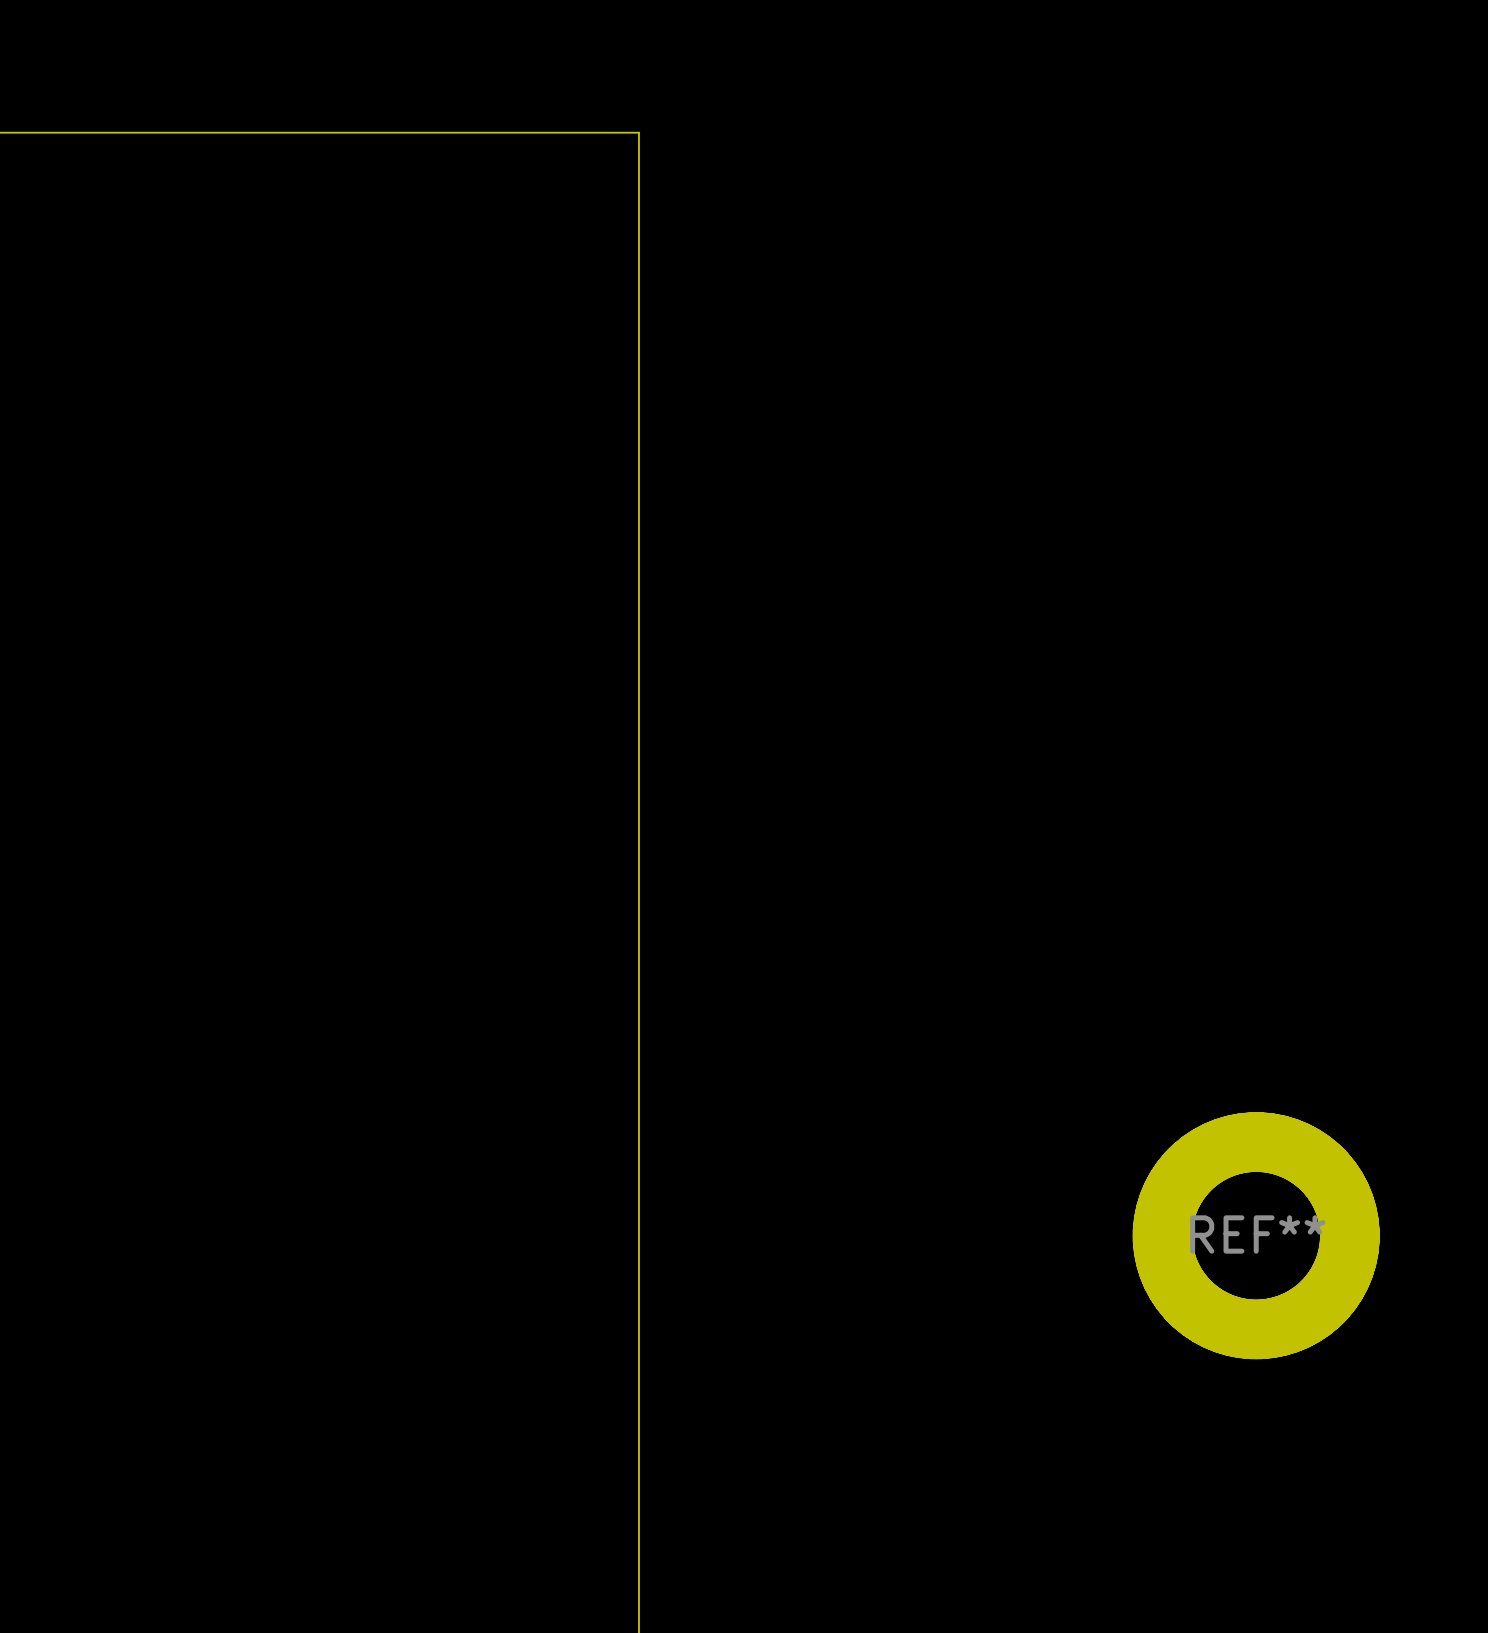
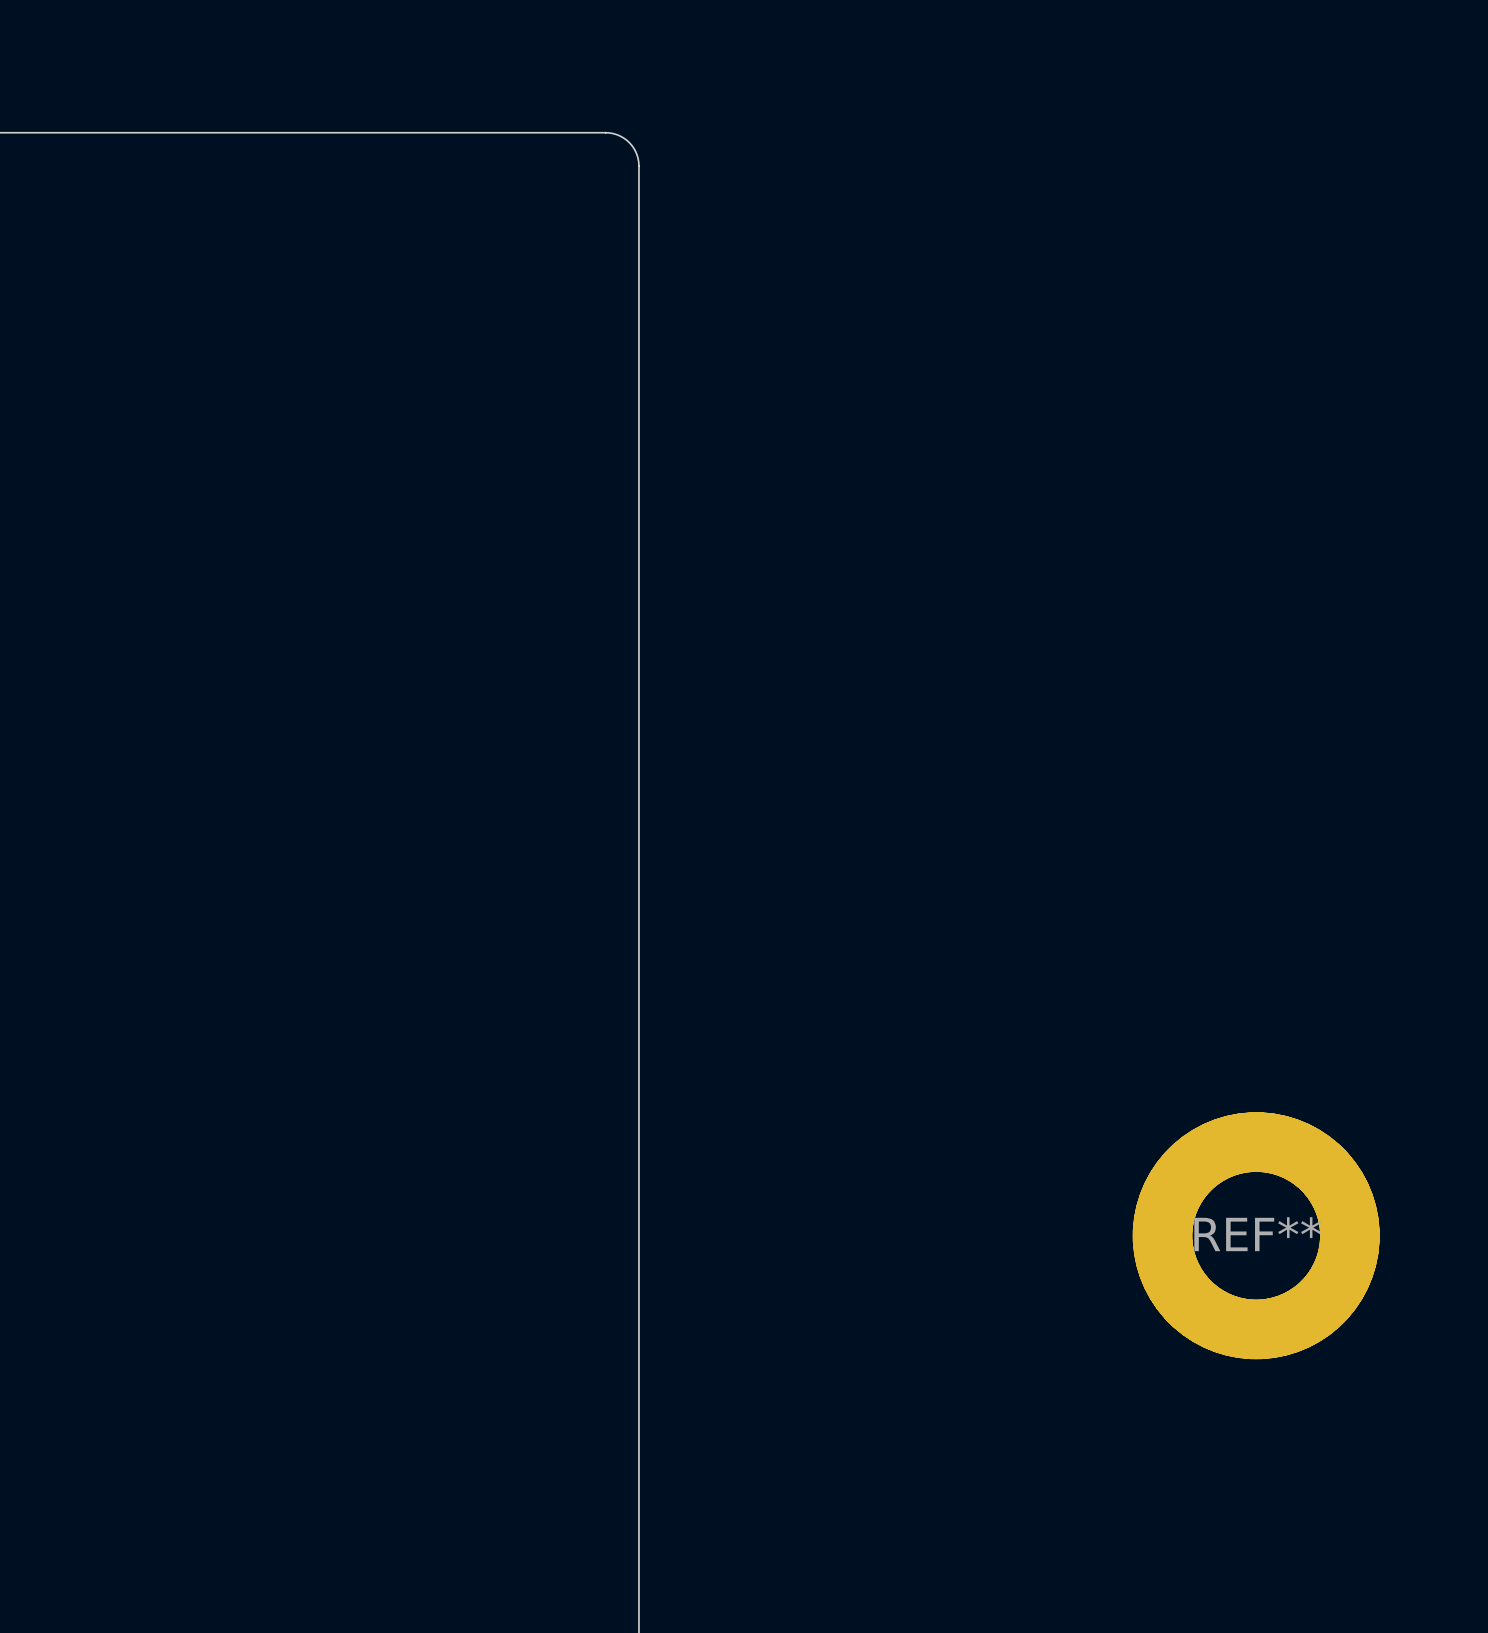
board edge: (605, 132) (638, 132) (638, 166) -> (605, 132) (620, 136) (629, 142) (635, 151) (638, 166)

